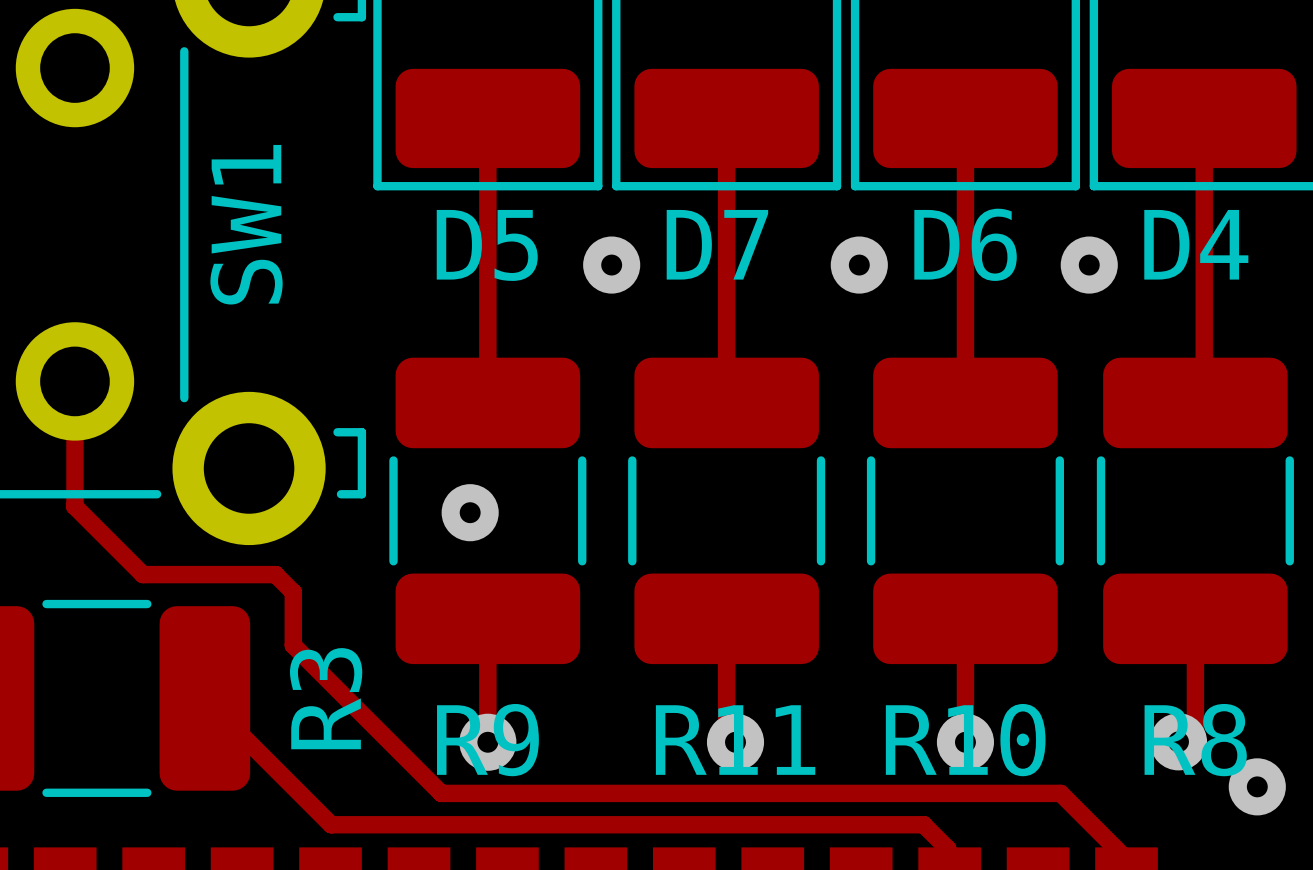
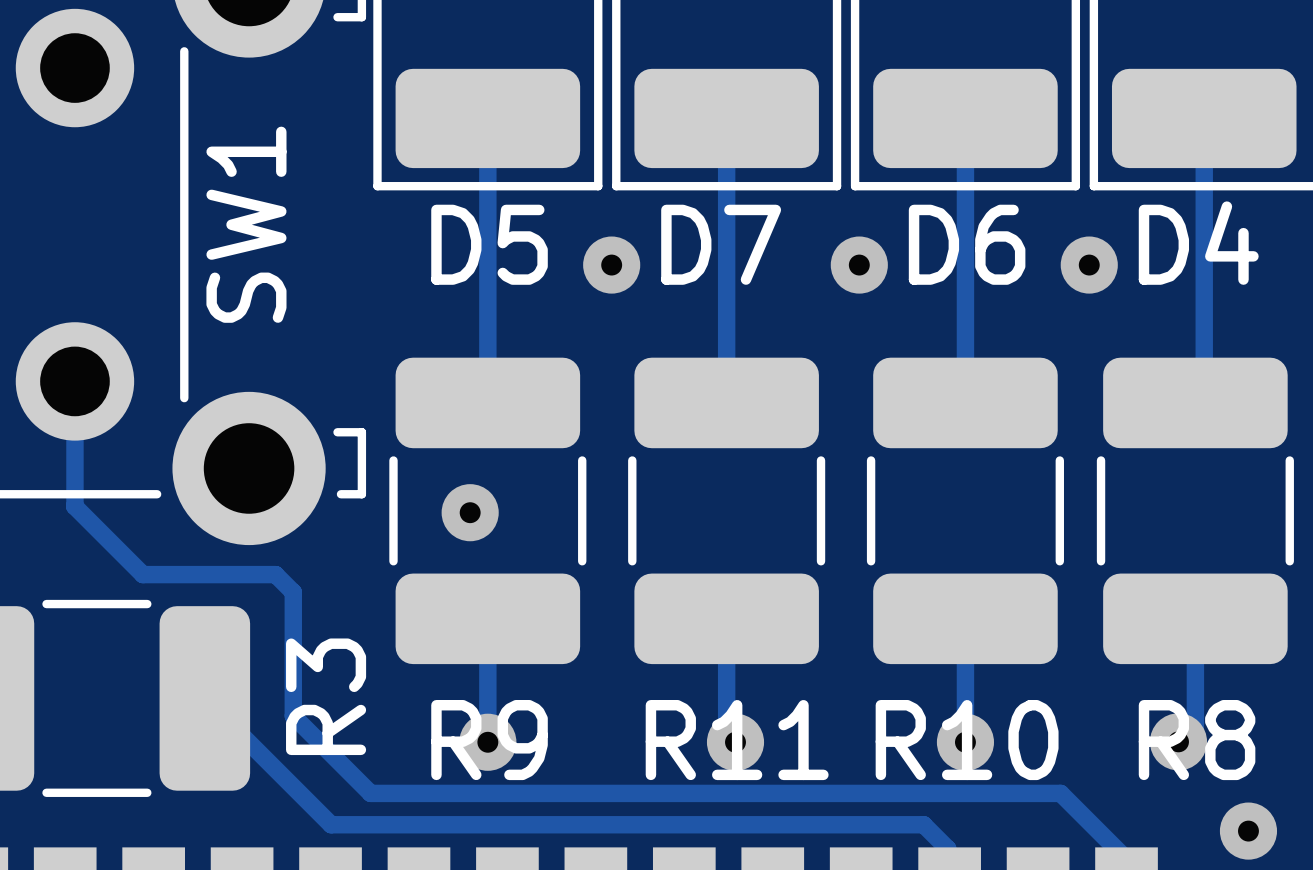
track: (293, 645) (441, 793) -> (293, 645) (293, 716) (370, 793) (441, 793)
via position: (1257, 786) -> (1248, 831)

